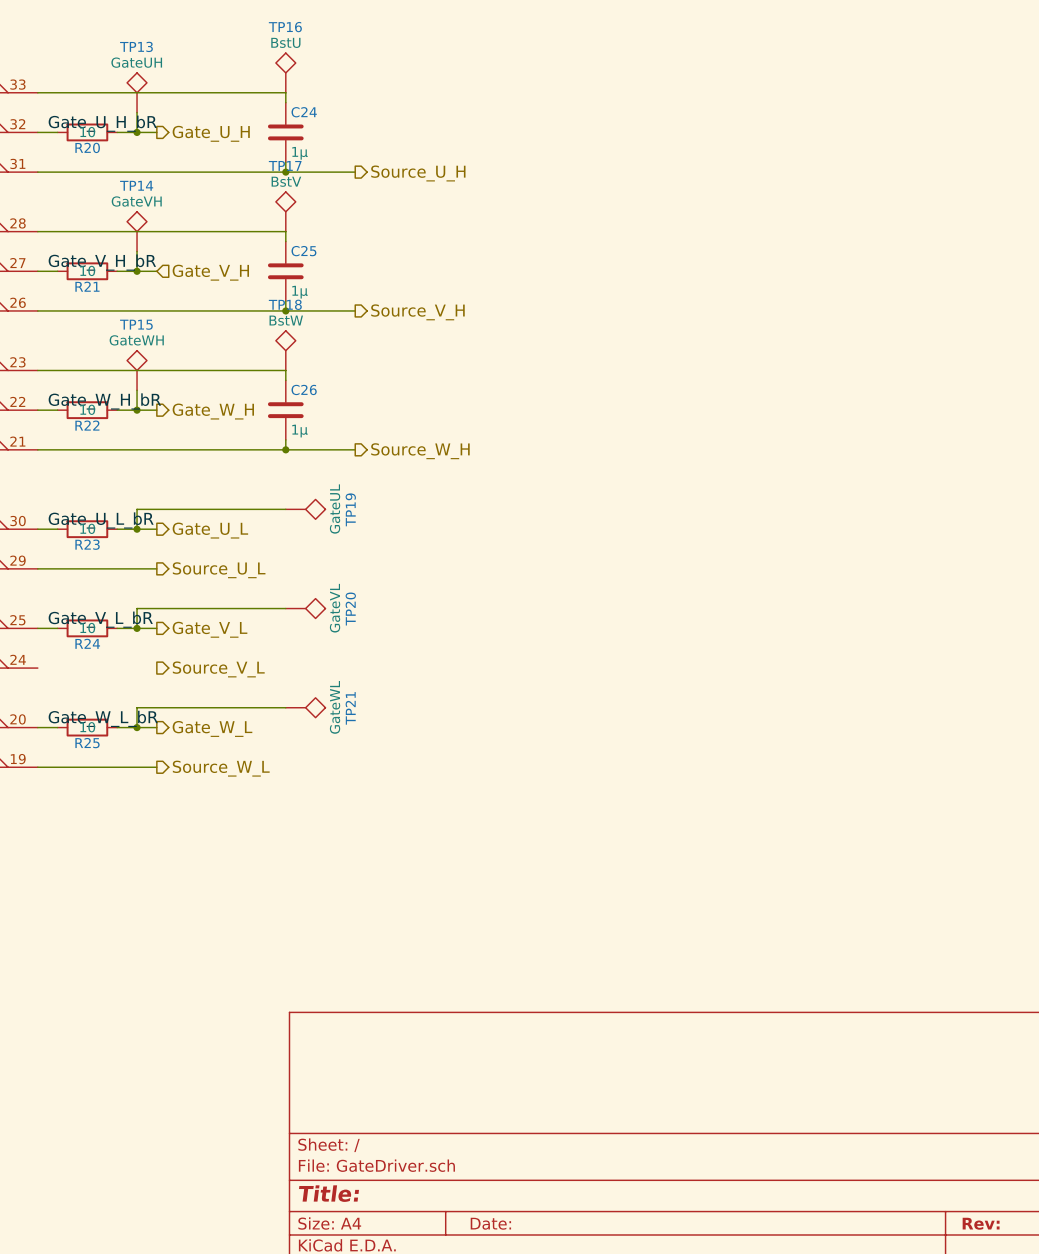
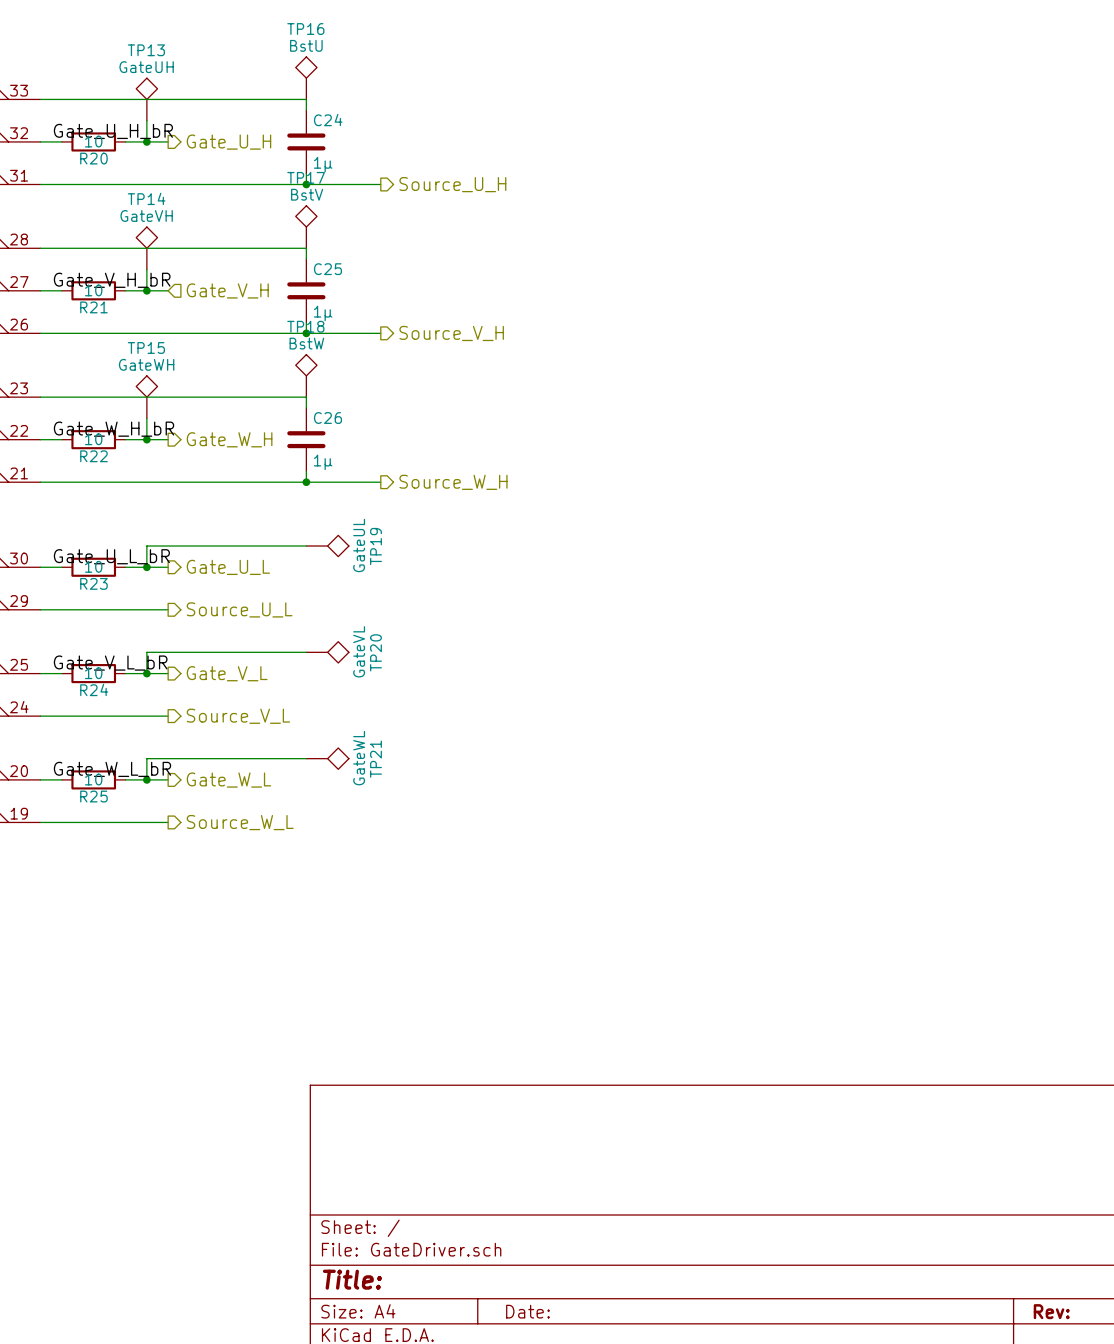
wire: none -> (40, 716) (168, 716)

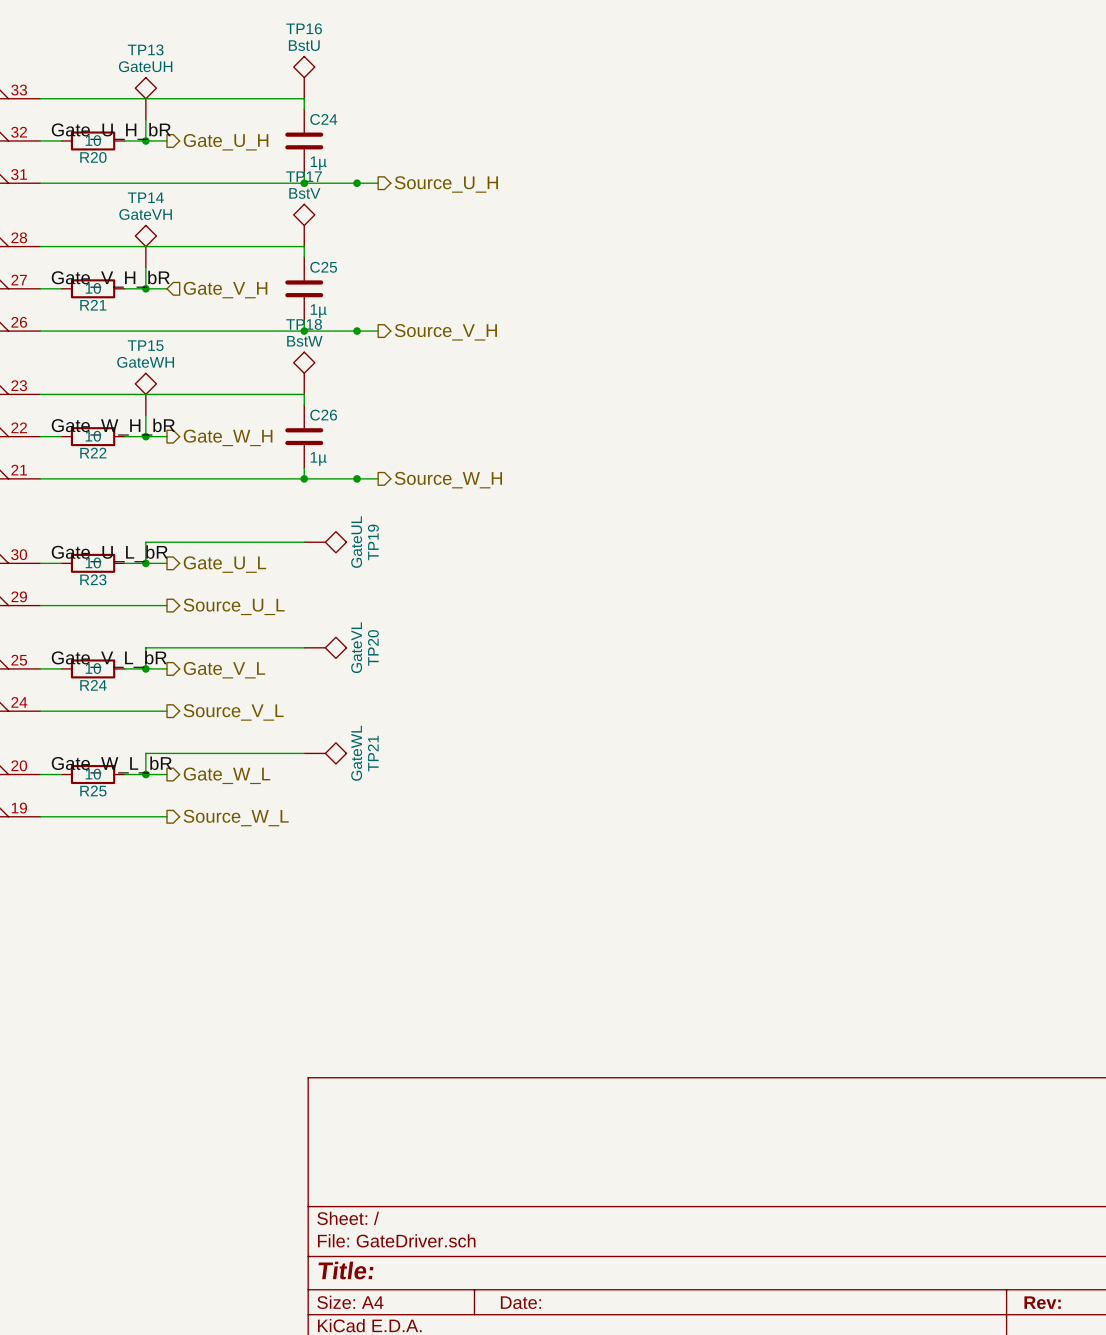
junction: none -> (357, 183)
junction: none -> (357, 331)
junction: none -> (357, 478)

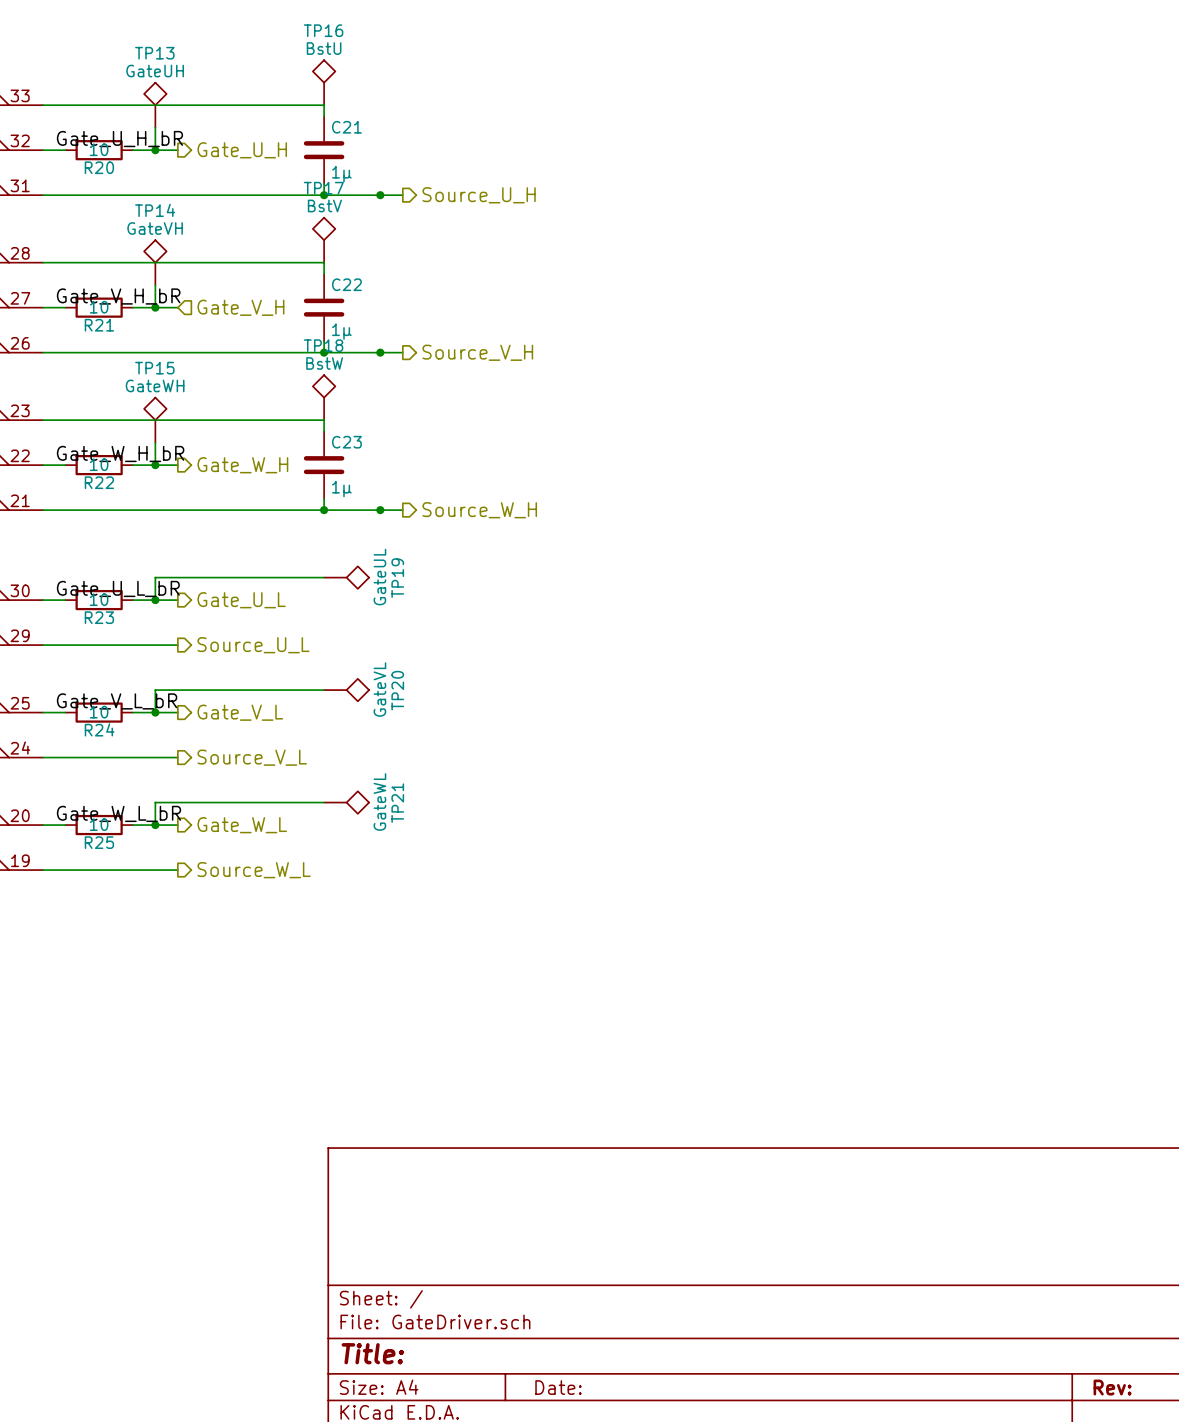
C24 name: C24 (323, 119) -> C21 (346, 127)
C25 name: C25 (323, 267) -> C22 (346, 284)
C26 name: C26 (323, 415) -> C23 (346, 442)

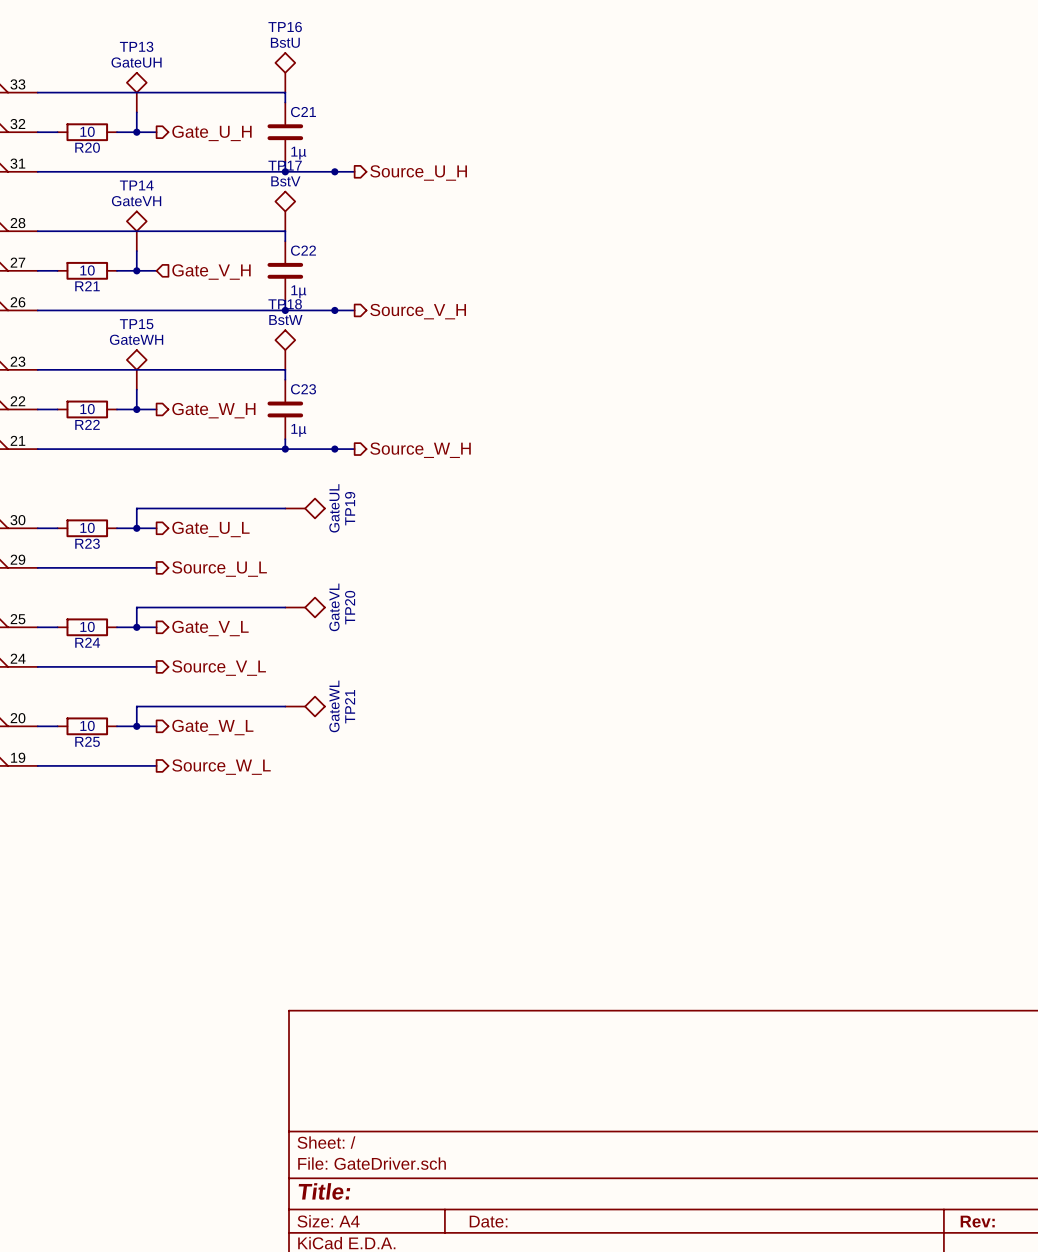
label: Gate_U_H_bR (119, 139) -> none
label: Gate_V_H_bR (118, 296) -> none
label: Gate_W_H_bR (120, 453) -> none
label: Gate_U_L_bR (118, 588) -> none
label: Gate_V_L_bR (117, 701) -> none
label: Gate_W_L_bR (118, 813) -> none

